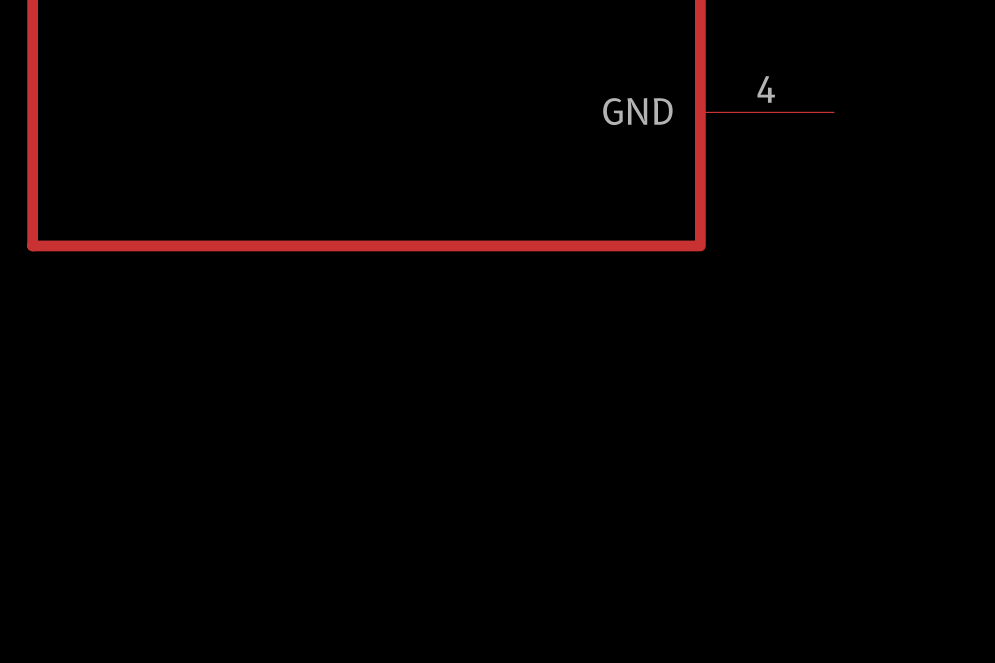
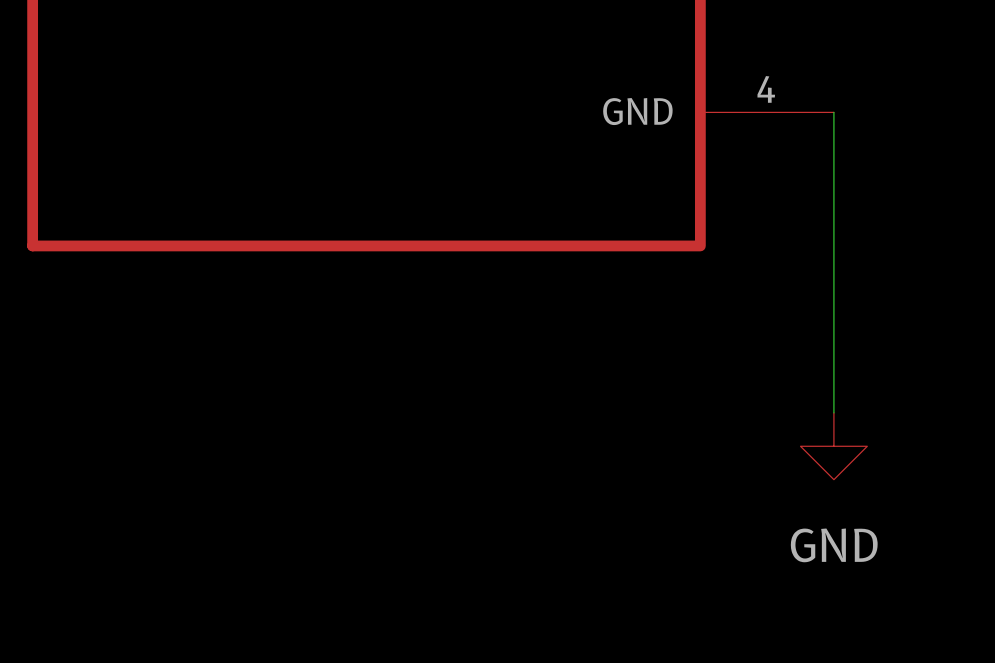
wire: none -> (833, 112) (833, 412)
power symbol: none -> GND (833, 446)

